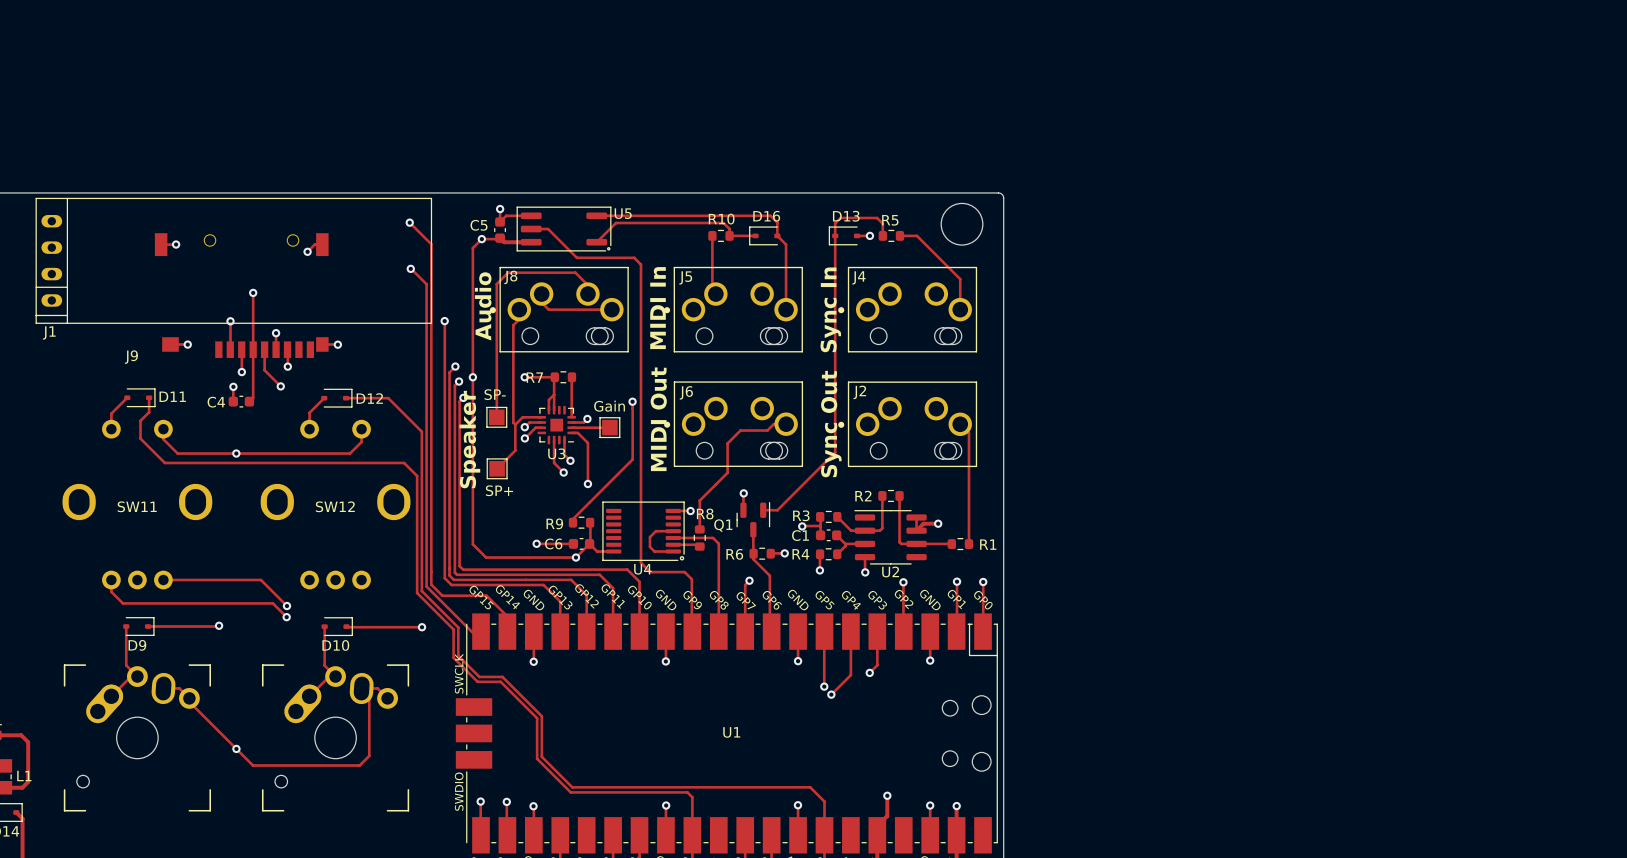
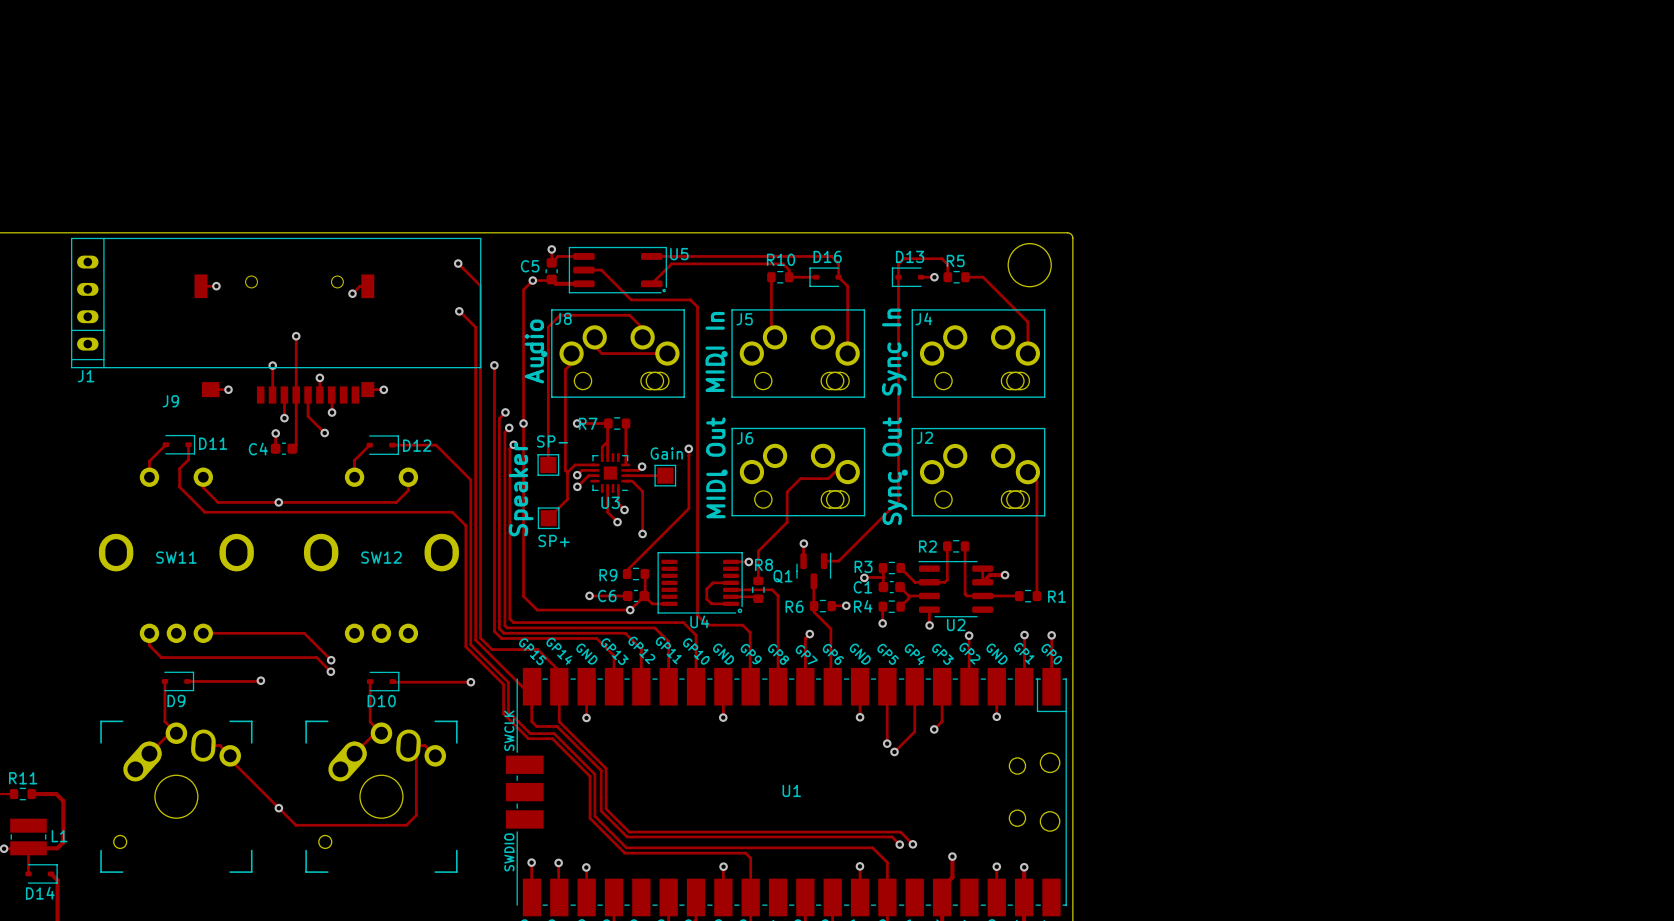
track: none -> (531, 696) (531, 721) (536, 726) (557, 726) (601, 770) (601, 810) (627, 836) (892, 836) (899, 844)
track: none -> (559, 696) (559, 721) (606, 768) (606, 809) (629, 832) (900, 832) (912, 844)
via: none -> (912, 844)
via: none -> (899, 844)

